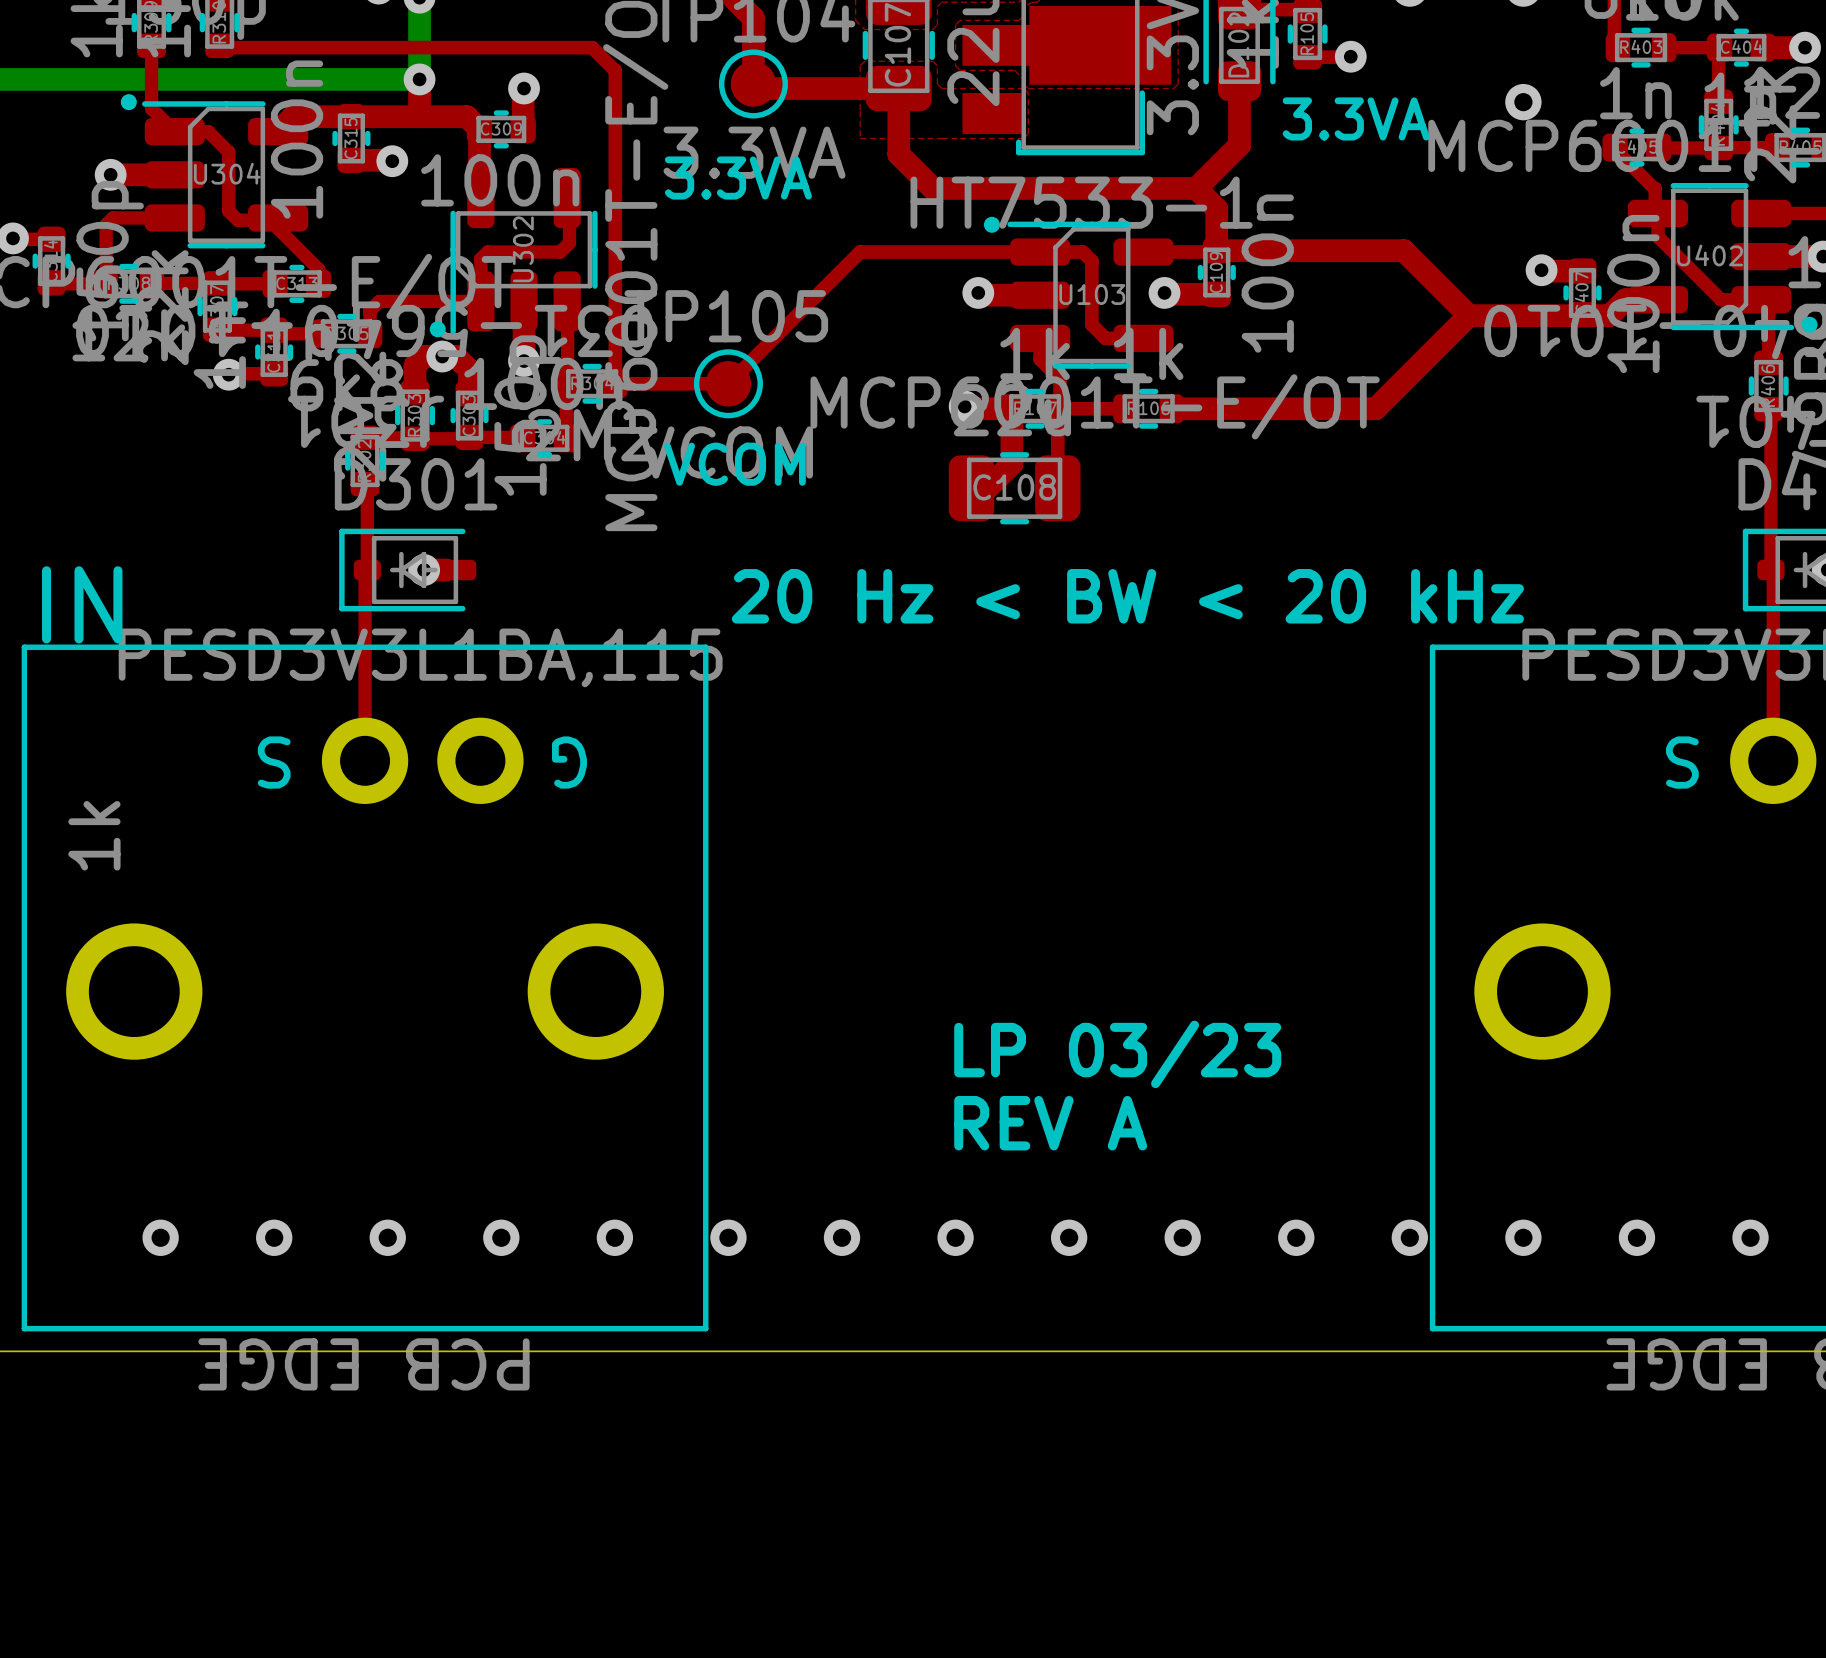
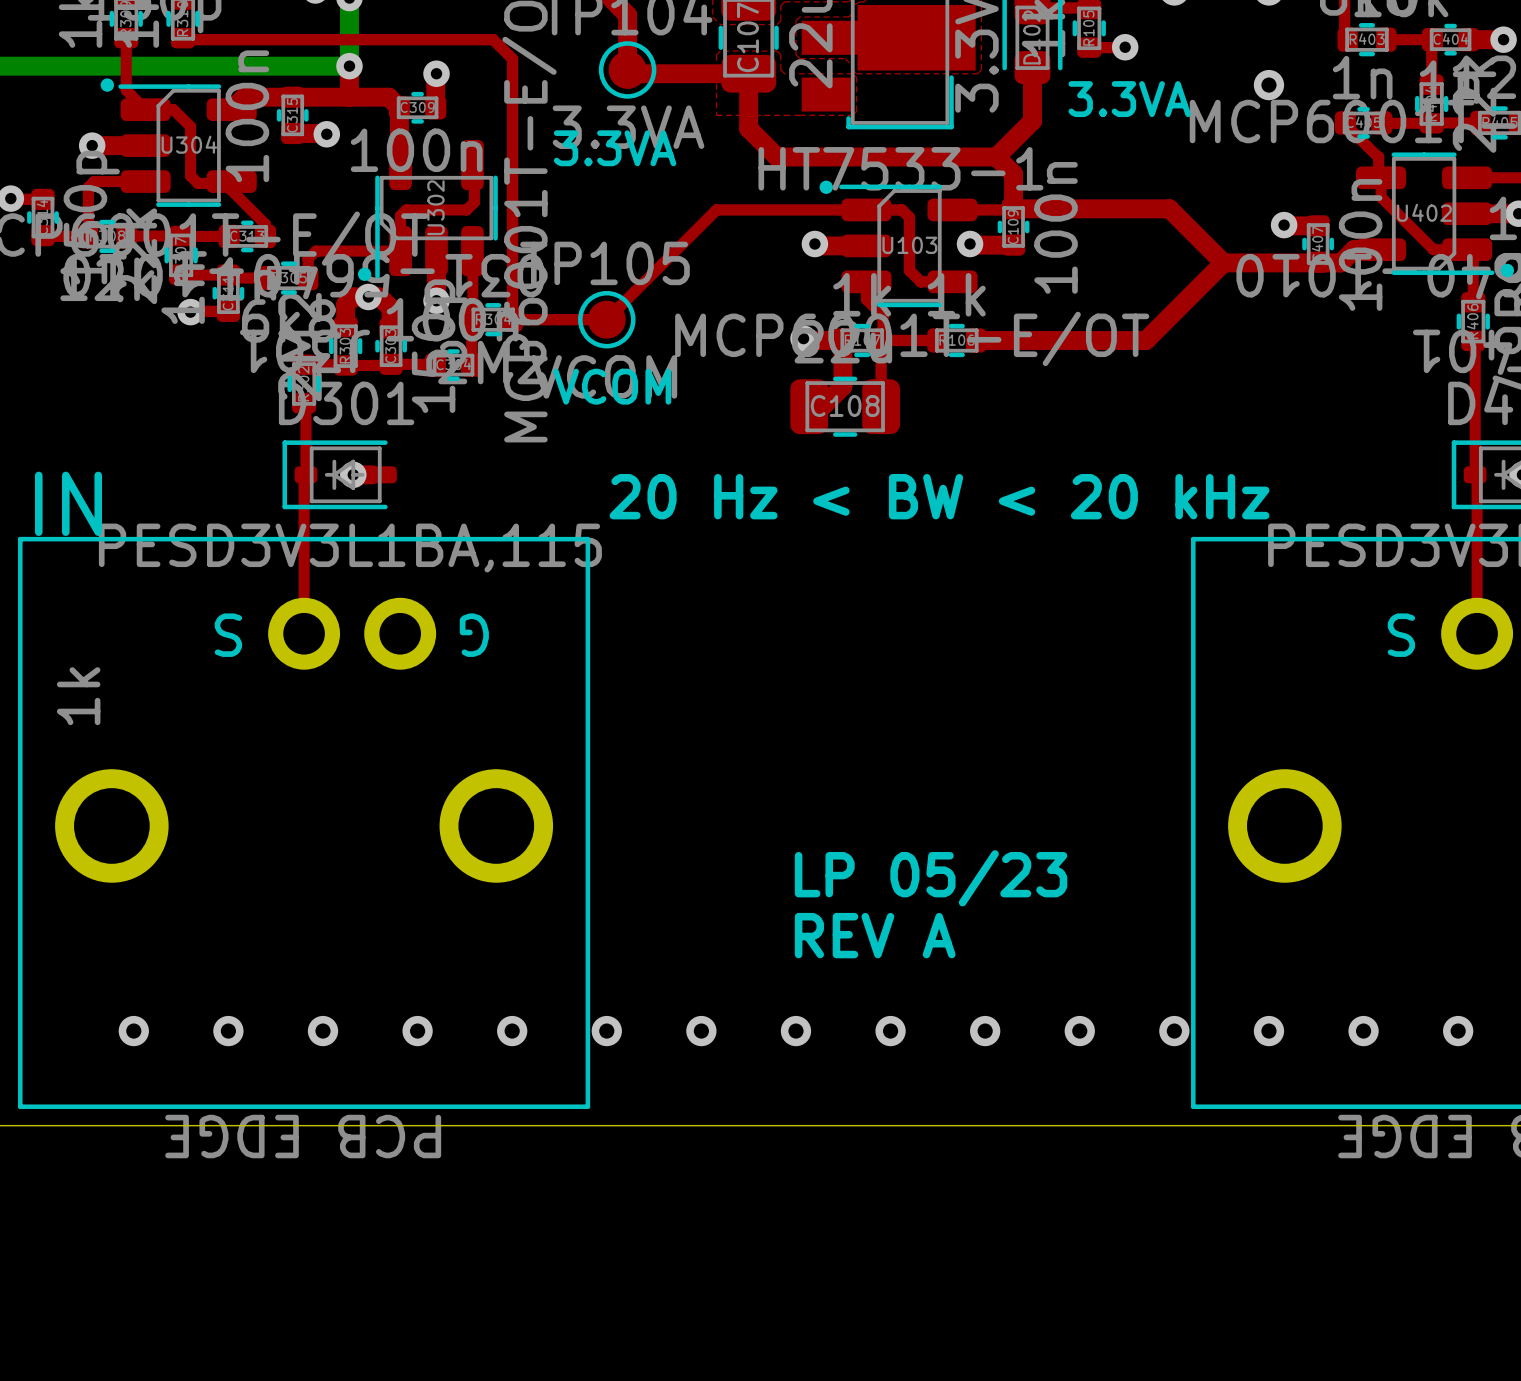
text: LP 03/23 (1117, 1054) -> LP 05/23 (931, 878)

